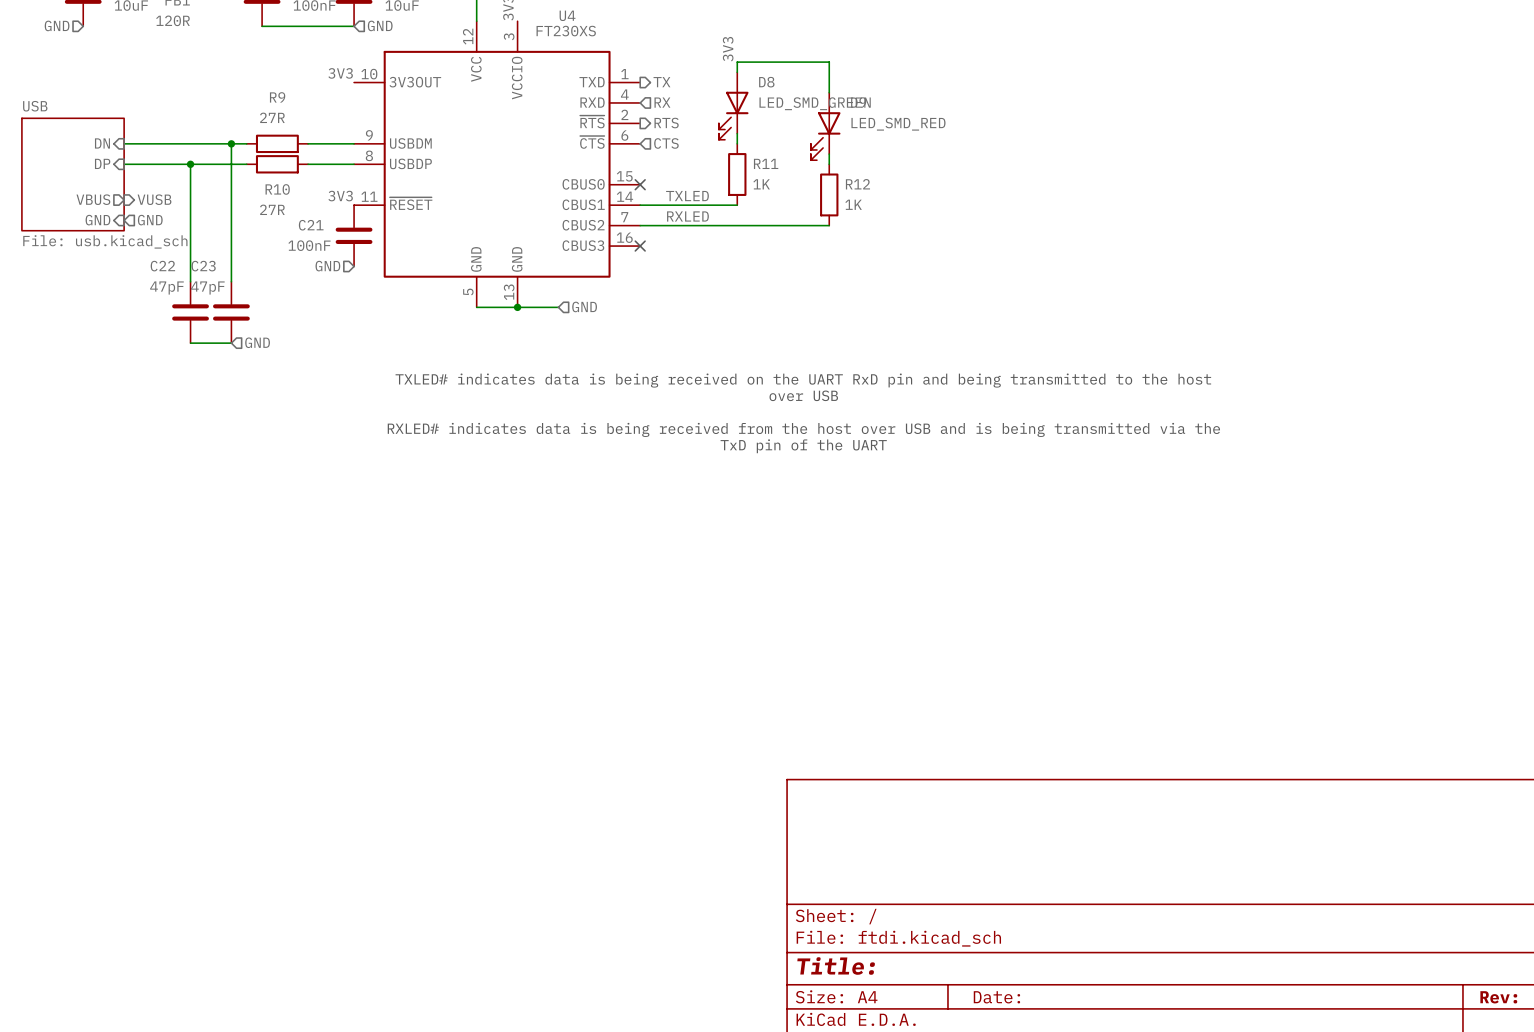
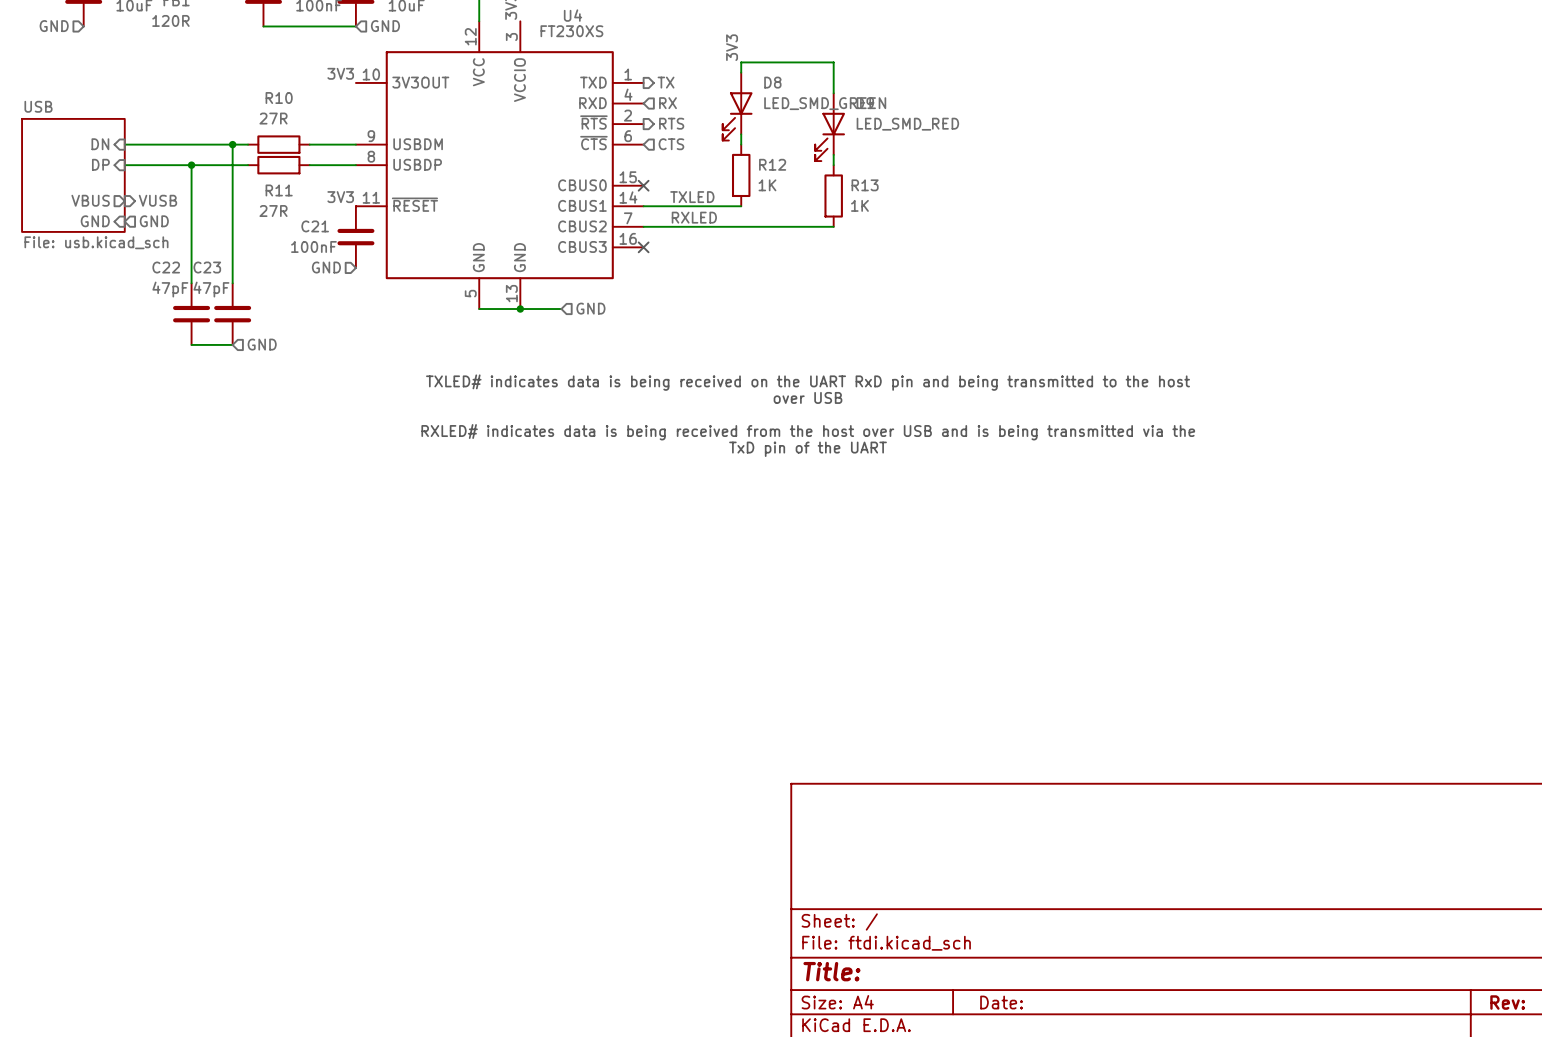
R9 name: R9 (277, 97) -> R10 (279, 98)
R11 name: R11 (766, 163) -> R12 (772, 164)
R12 name: R12 (857, 184) -> R13 (865, 185)
R10 name: R10 (277, 189) -> R11 (279, 190)

